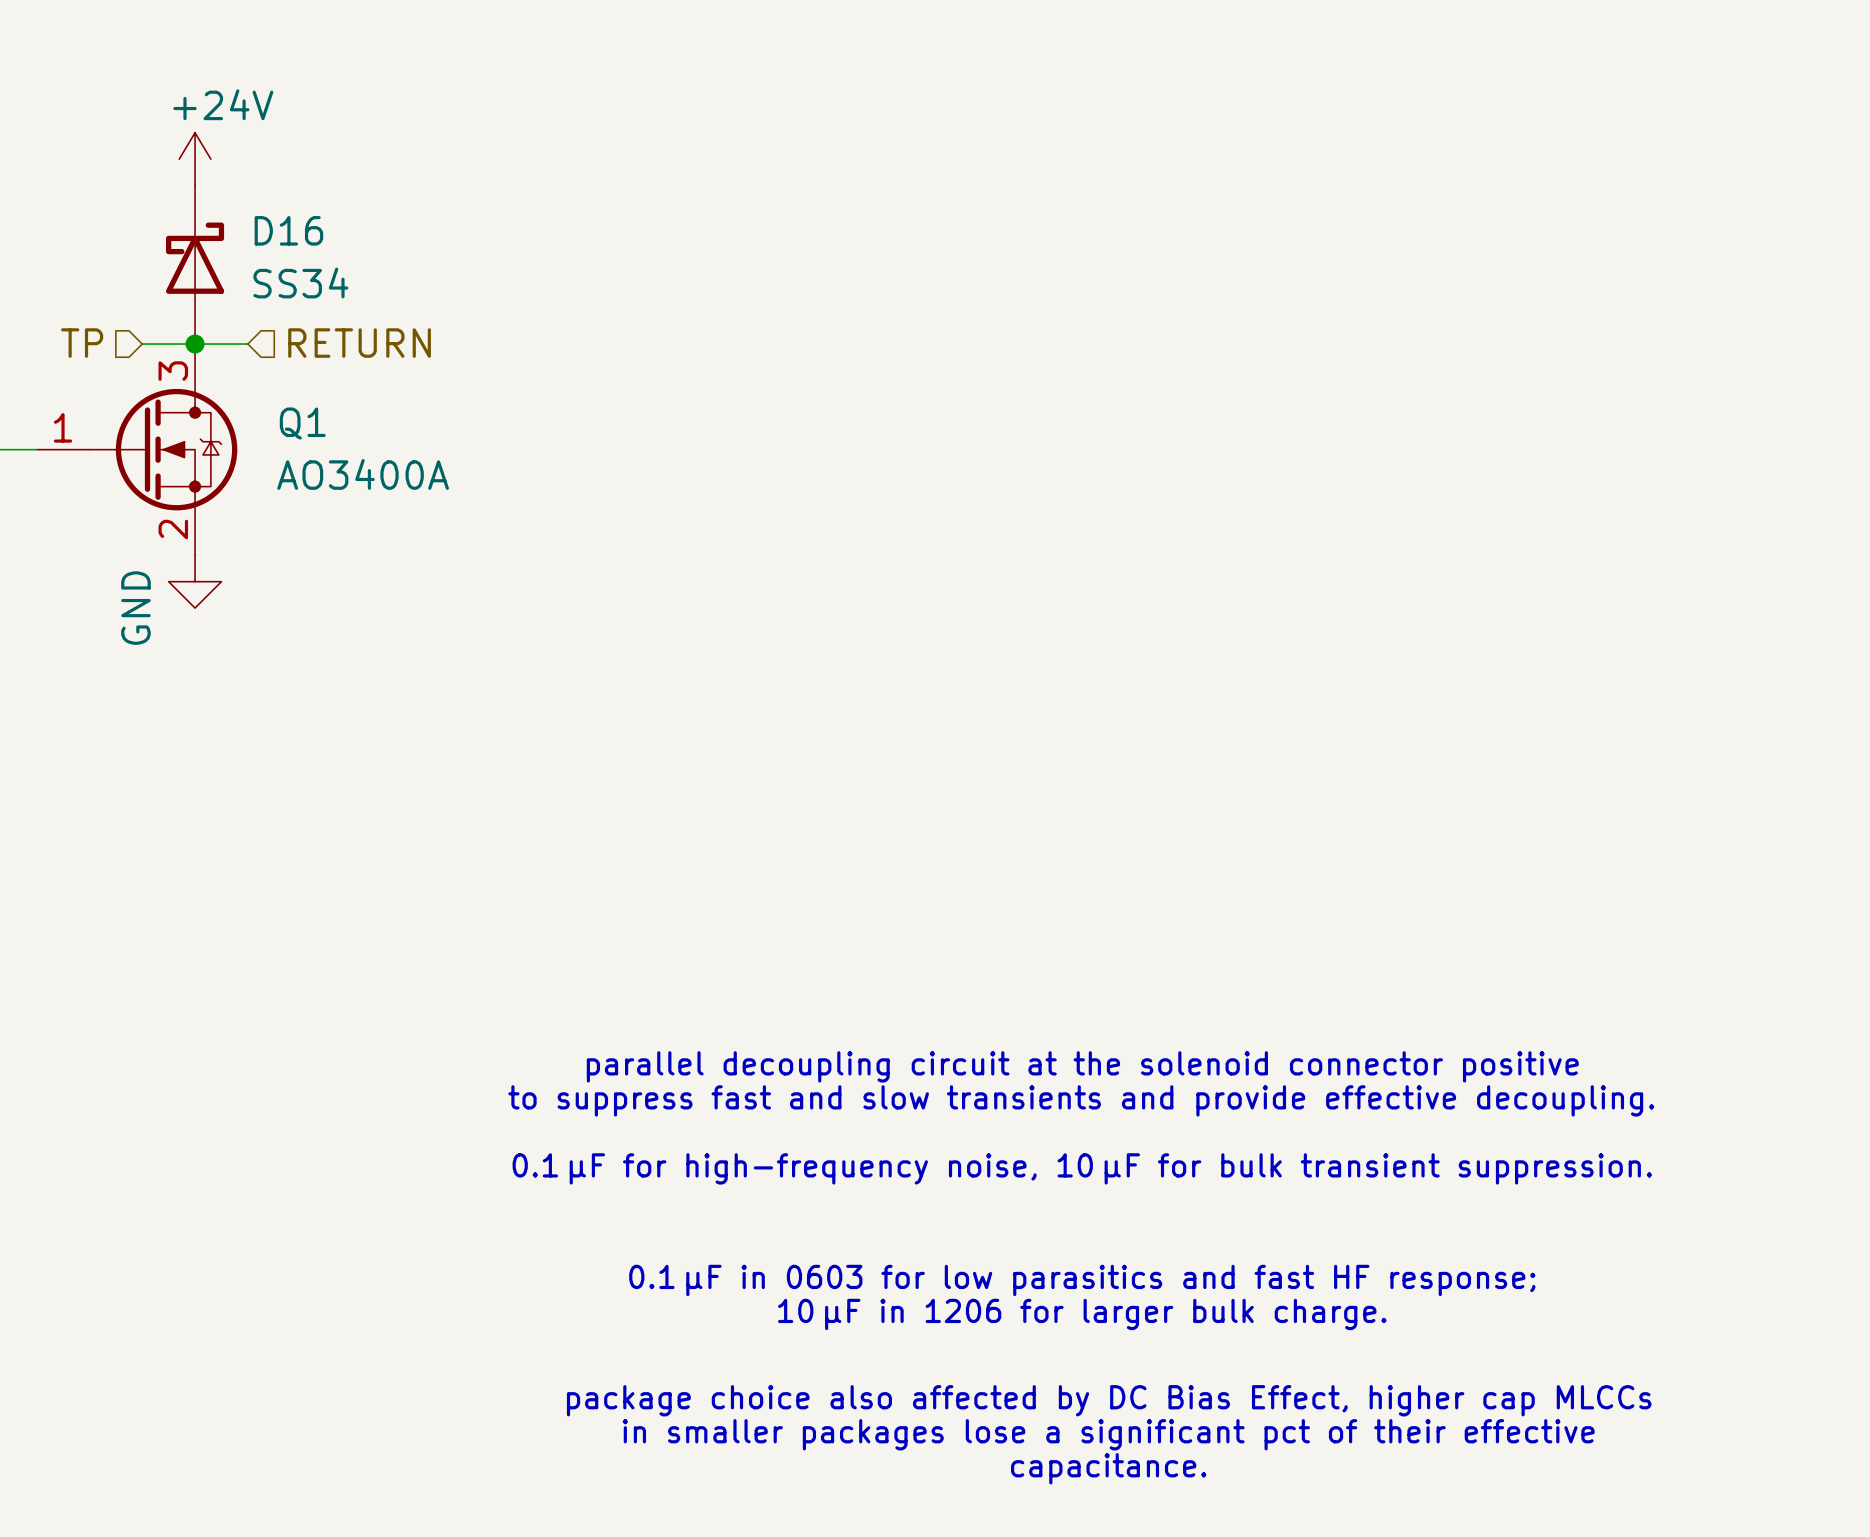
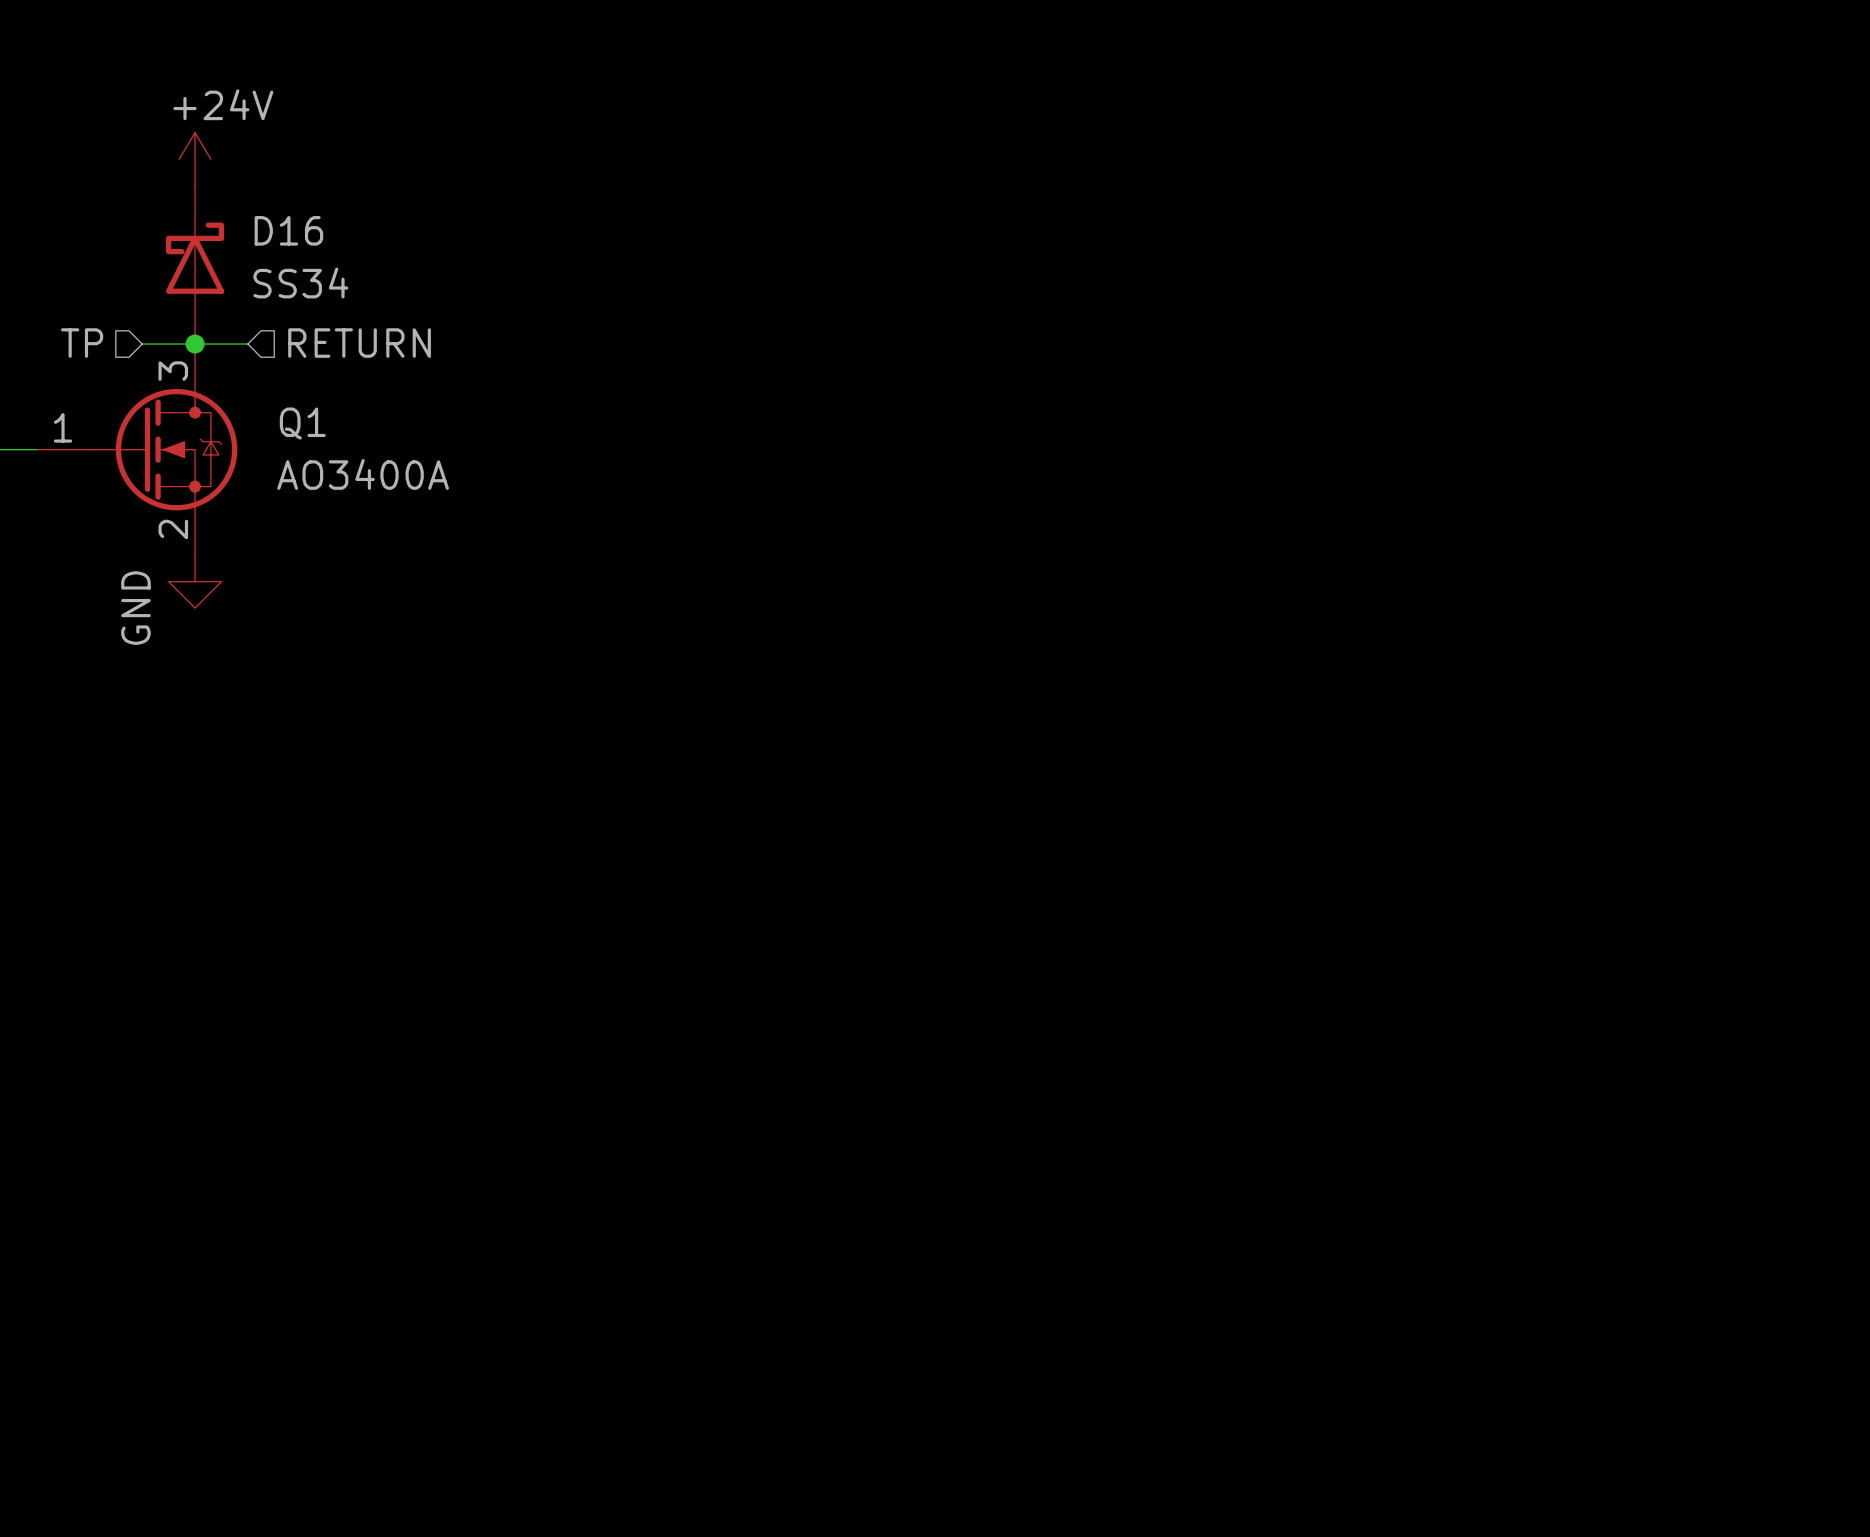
text: parallel decoupling circuit at the solenoid connector positive (1082, 1066) -> none
text: to suppress fast and slow transients and provide effective decoupling. (1081, 1100) -> none
text: 0.1 µF for high-frequency noise, 10 µF for bulk transient suppression. (1082, 1168) -> none
text: 0.1 µF in 0603 for low parasitics and fast HF response; (1082, 1280) -> none
text: 10 µF in 1206 for larger bulk charge. (1082, 1314) -> none
text: package choice also affected by DC Bias Effect, higher cap MLCCs (1109, 1400) -> none
text: in smaller packages lose a significant pct of their effective (1108, 1434) -> none
text: capacitance. (1108, 1468) -> none

